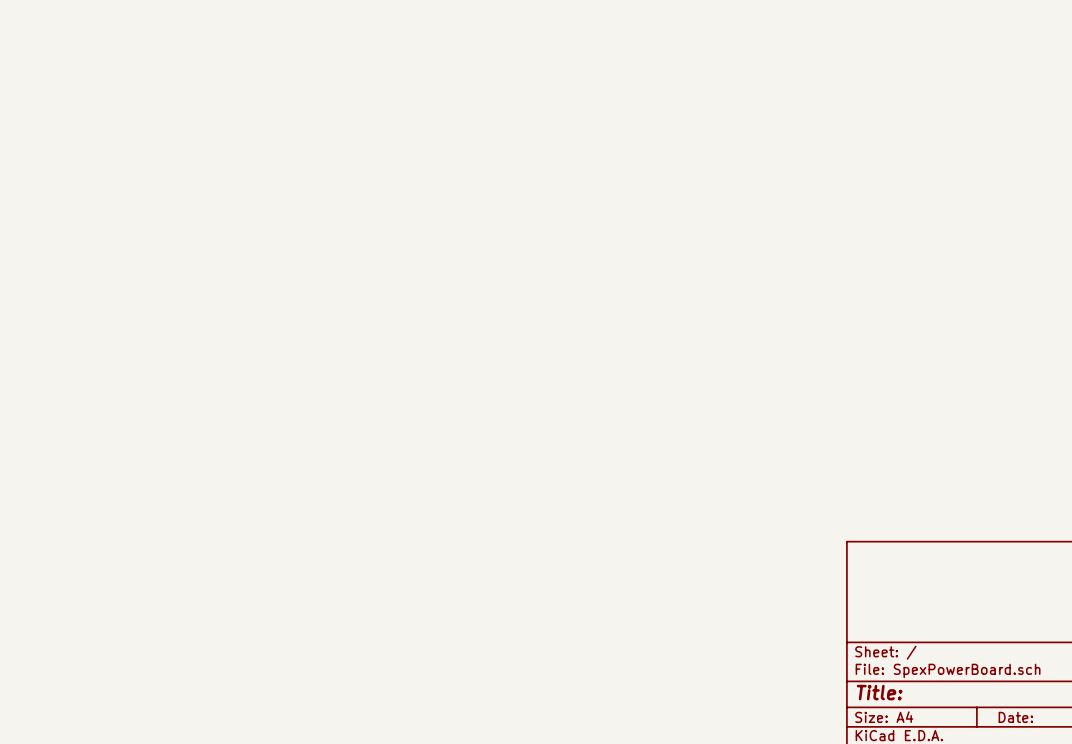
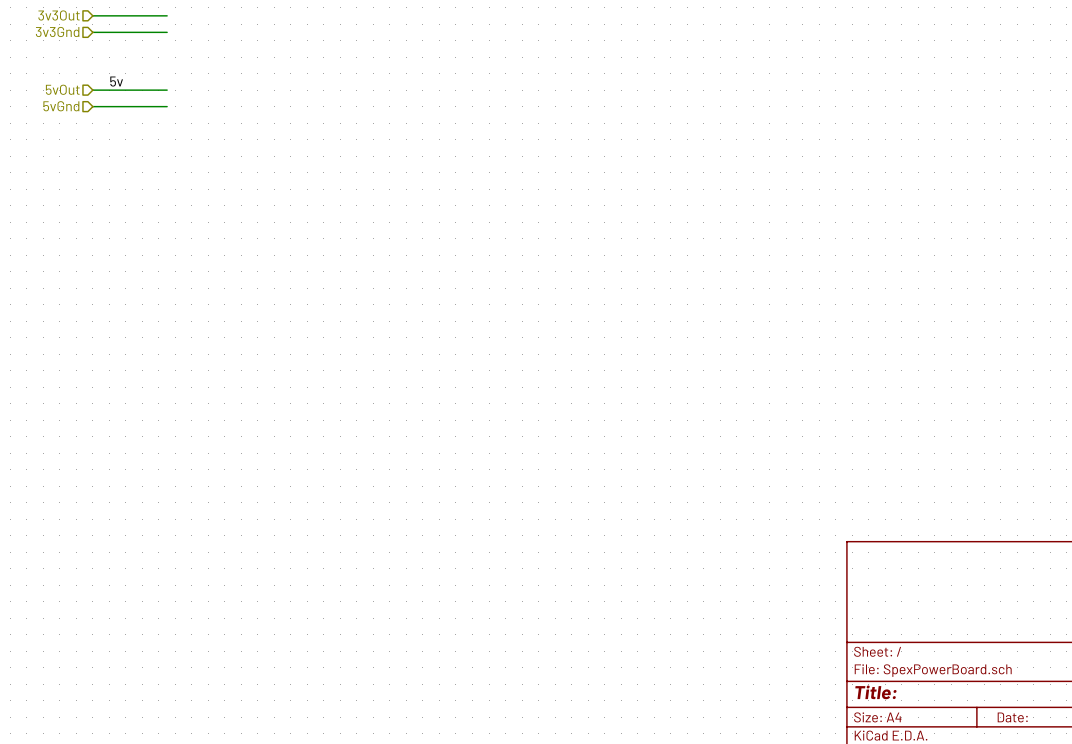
hierarchical label: none -> 3v3Out (59, 15)
wire: none -> (92, 15) (167, 15)
hierarchical label: none -> 3v3Gnd (57, 31)
wire: none -> (92, 32) (167, 32)
label: none -> 5v (116, 81)
hierarchical label: none -> 5vOut (62, 89)
wire: none -> (92, 90) (167, 90)
hierarchical label: none -> 5vGnd (61, 106)
wire: none -> (92, 106) (167, 106)

